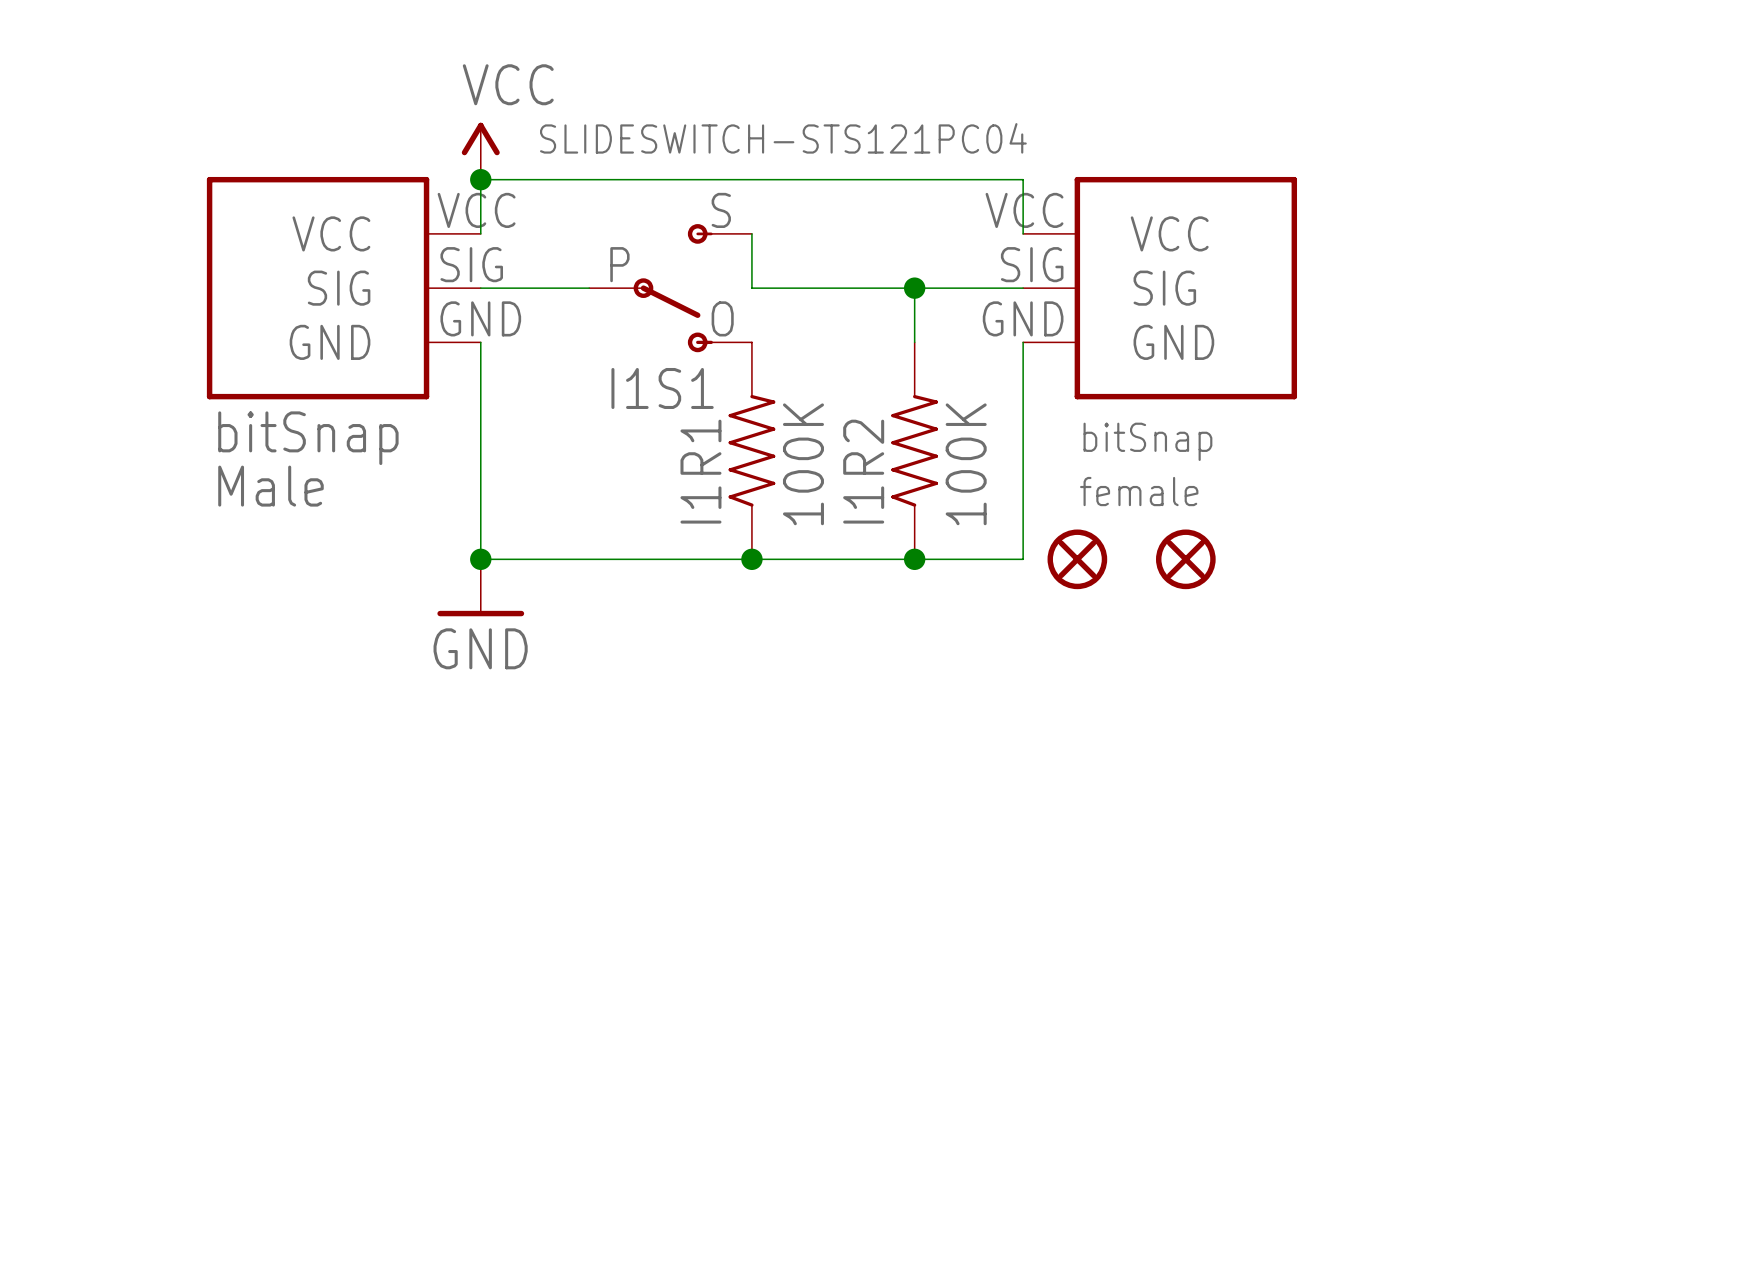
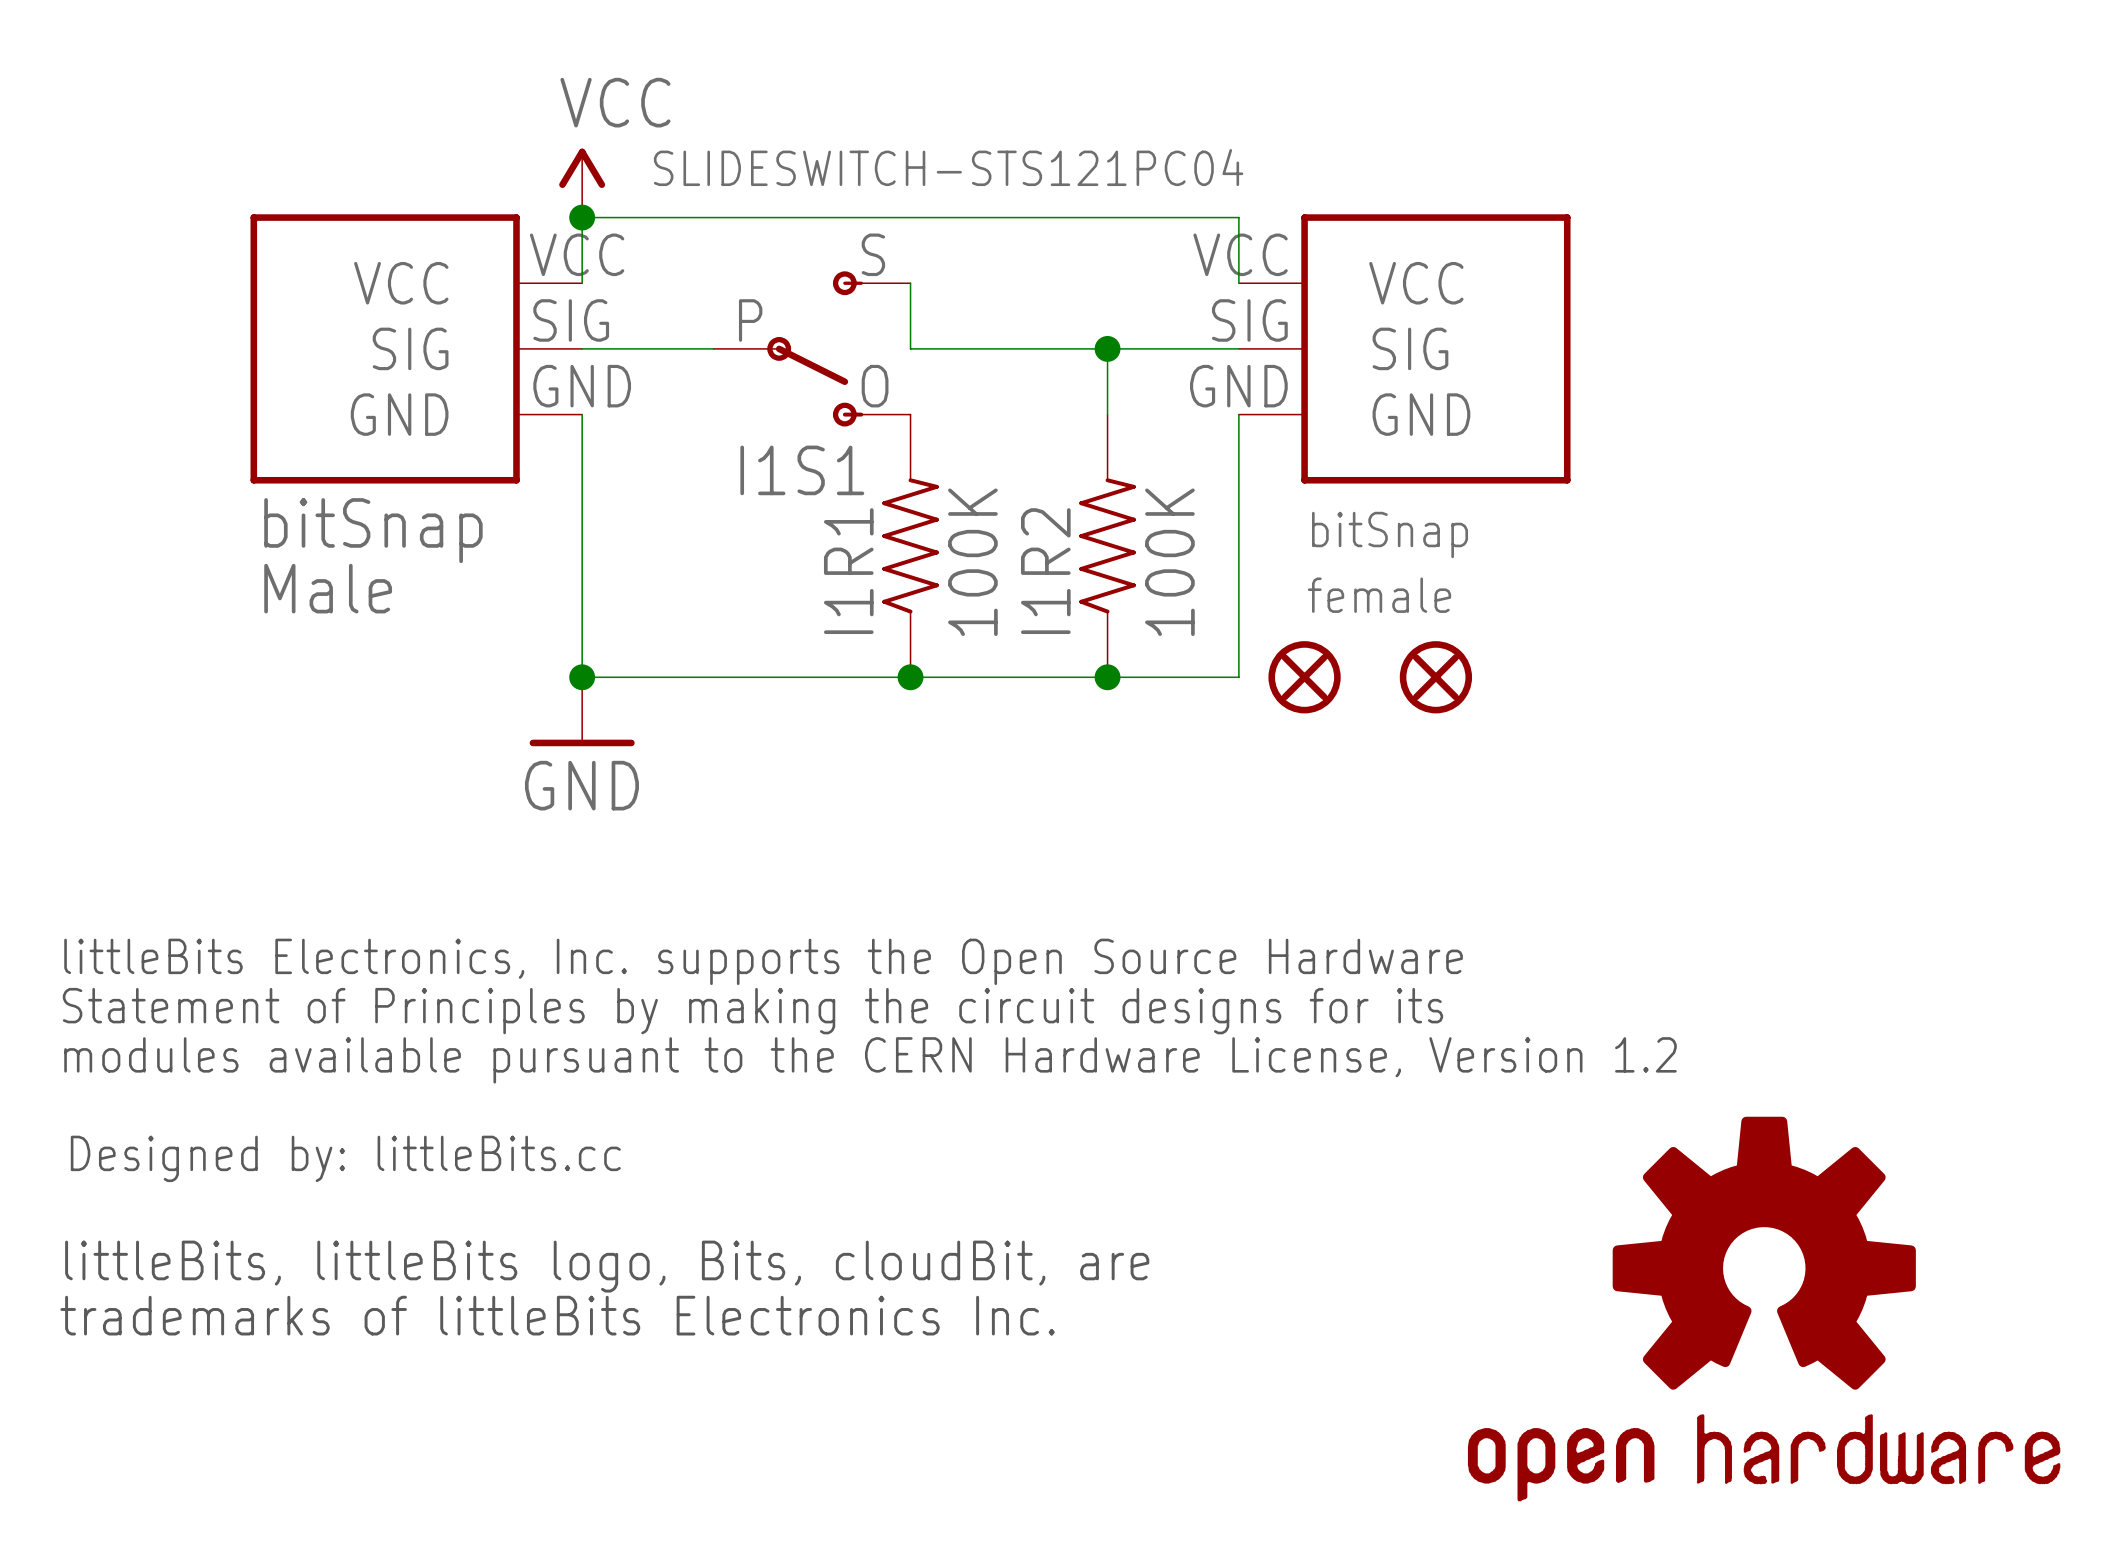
part: none -> (868, 1137)
part: none -> (1764, 1309)

